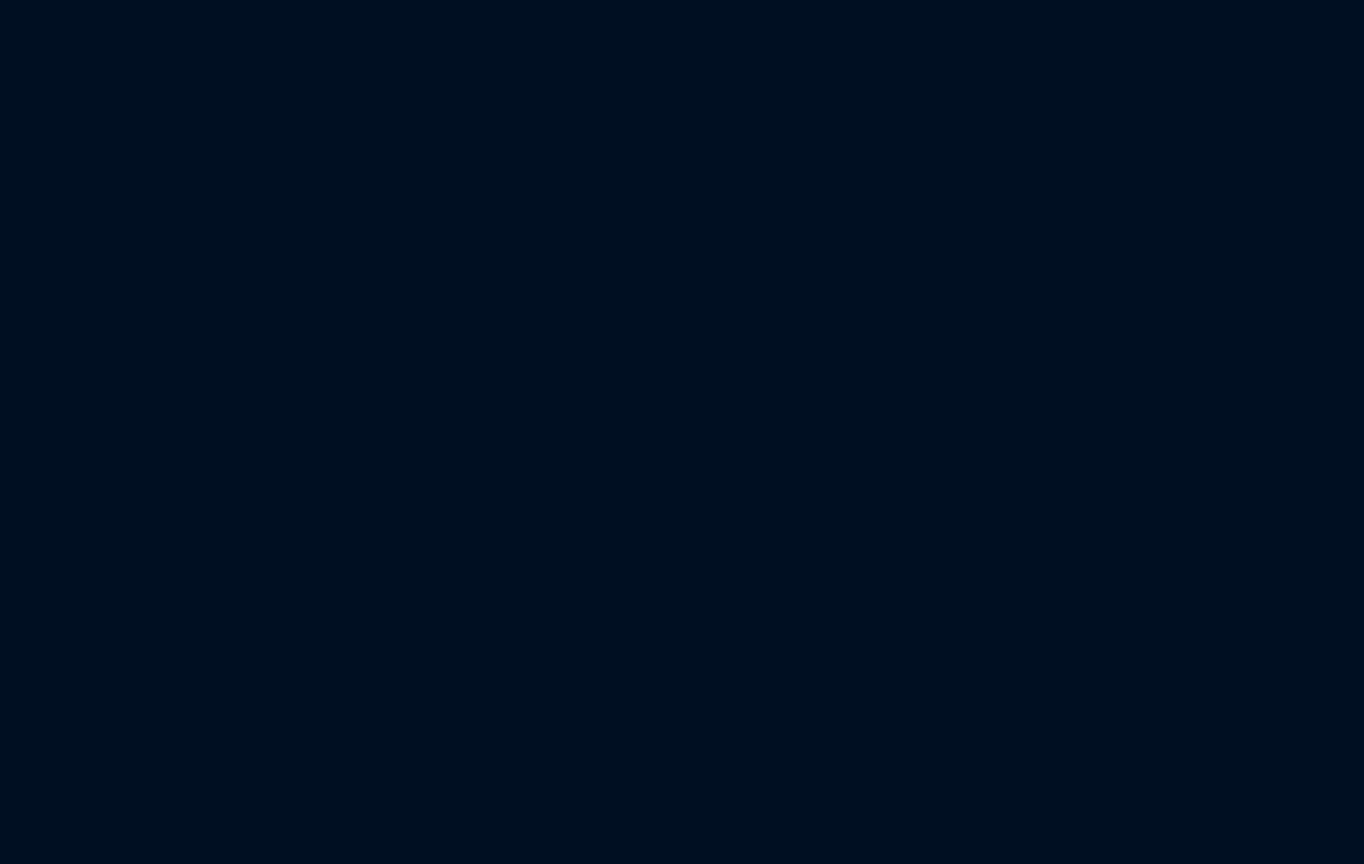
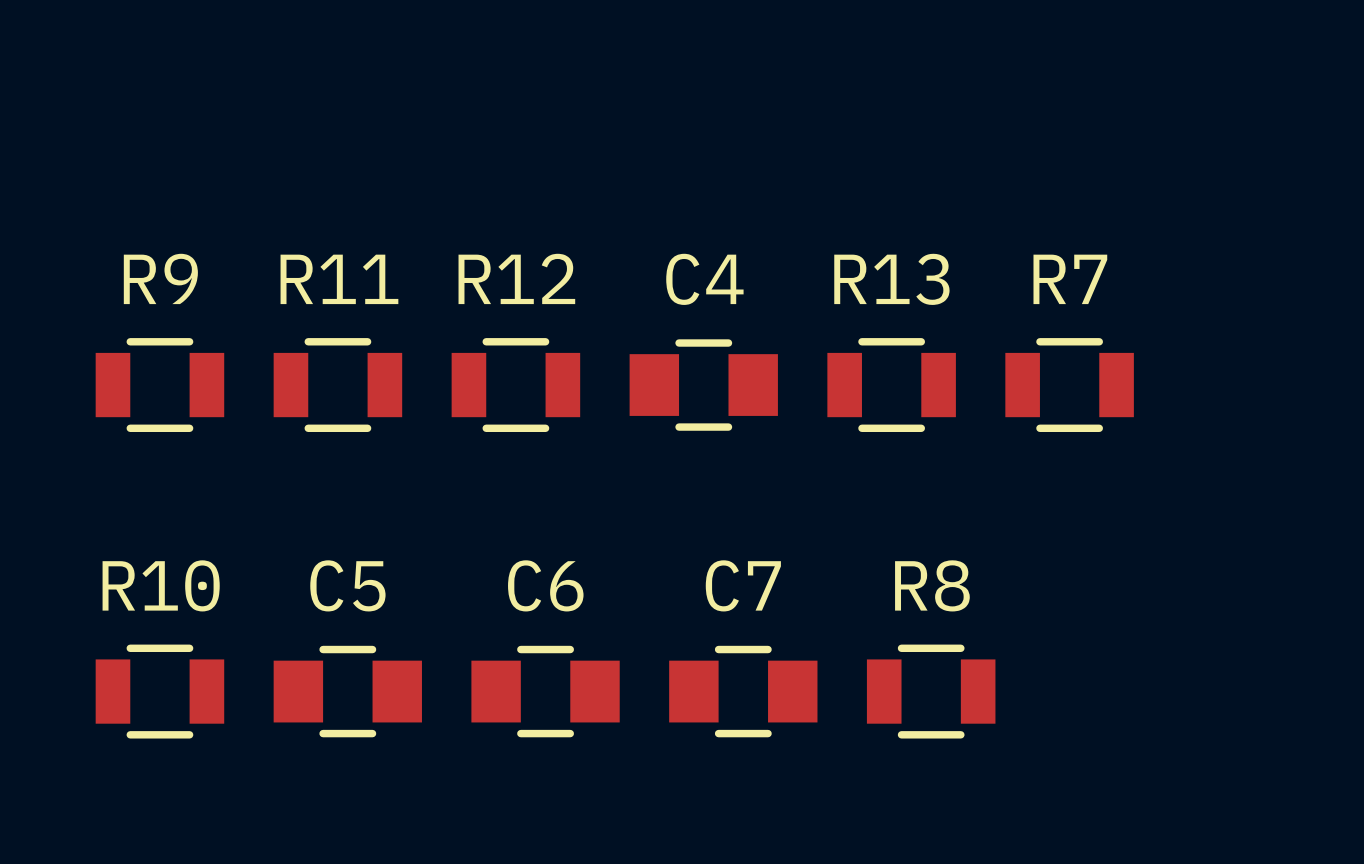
R9: none -> (159, 385)
R11: none -> (337, 385)
R12: none -> (515, 385)
C4: none -> (703, 385)
R13: none -> (891, 385)
R7: none -> (1069, 385)
R10: none -> (159, 691)
C5: none -> (347, 691)
C6: none -> (545, 691)
C7: none -> (743, 691)
R8: none -> (931, 691)

